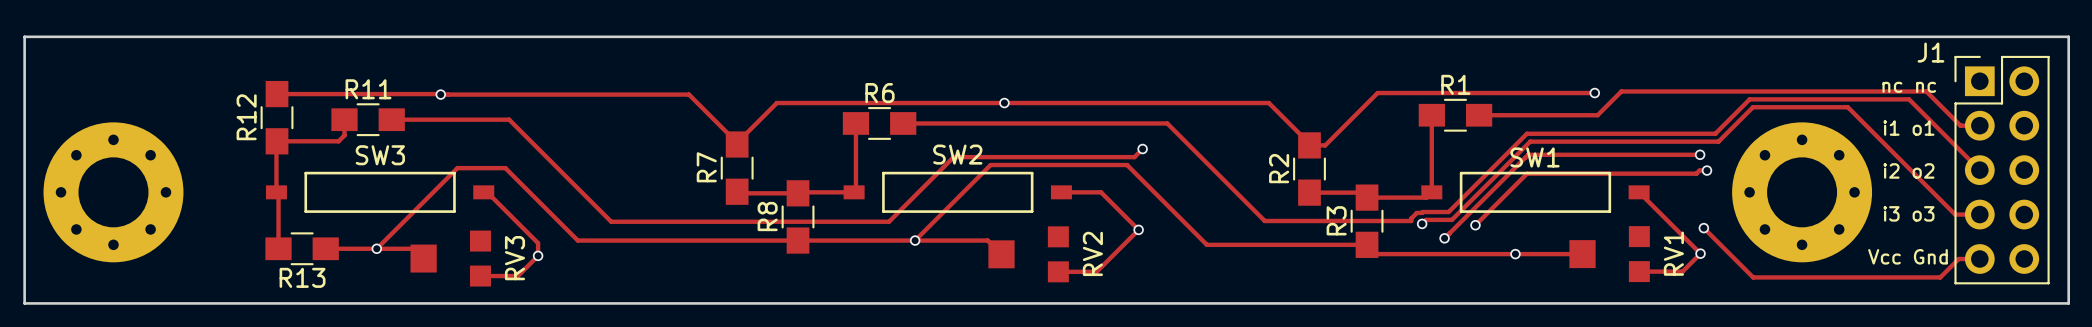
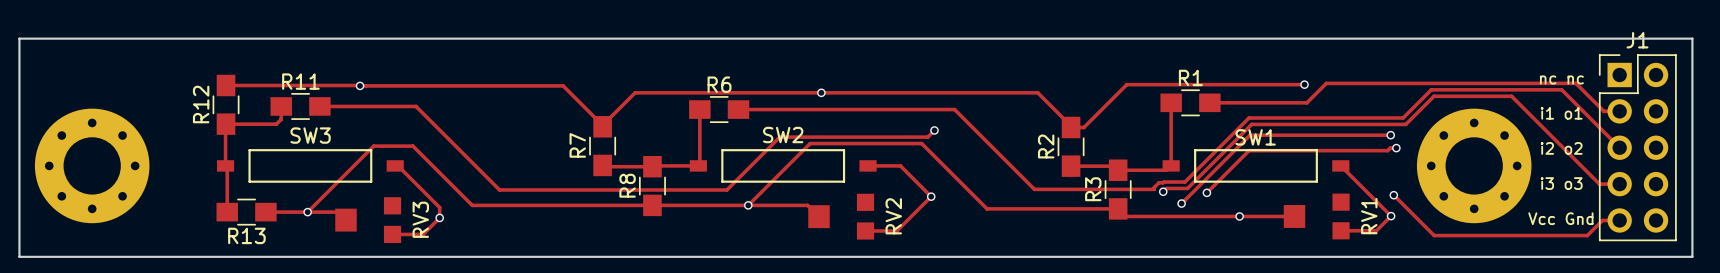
J1 name position: J1 (1930, 52) -> J1 (1637, 40)

